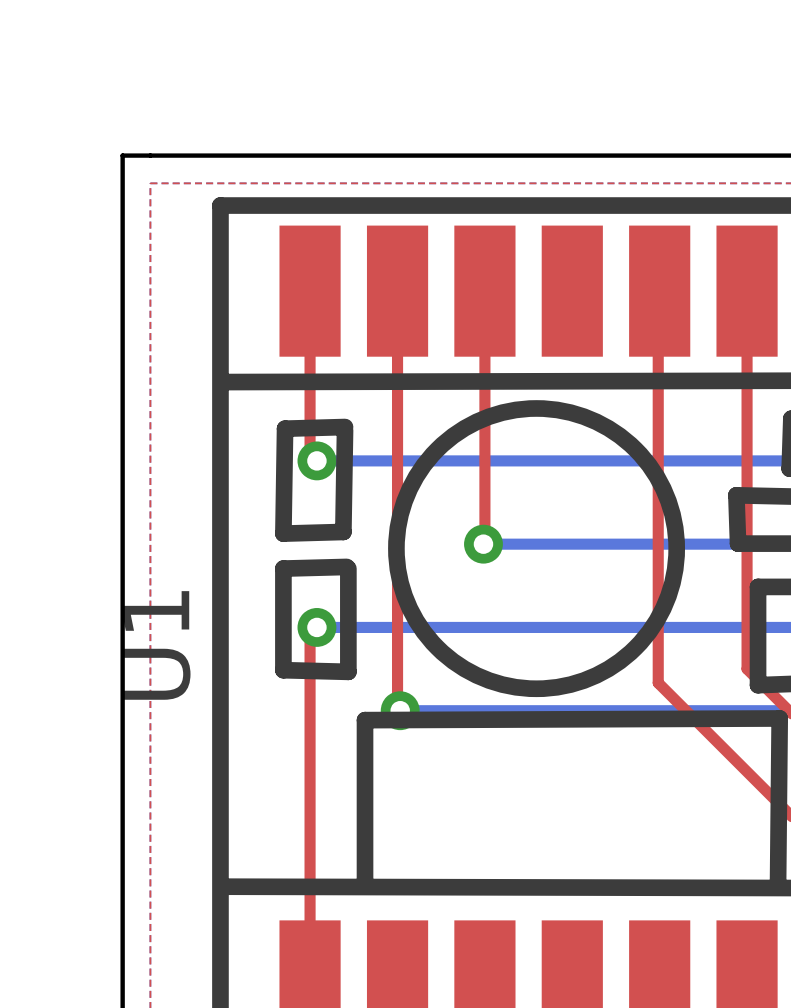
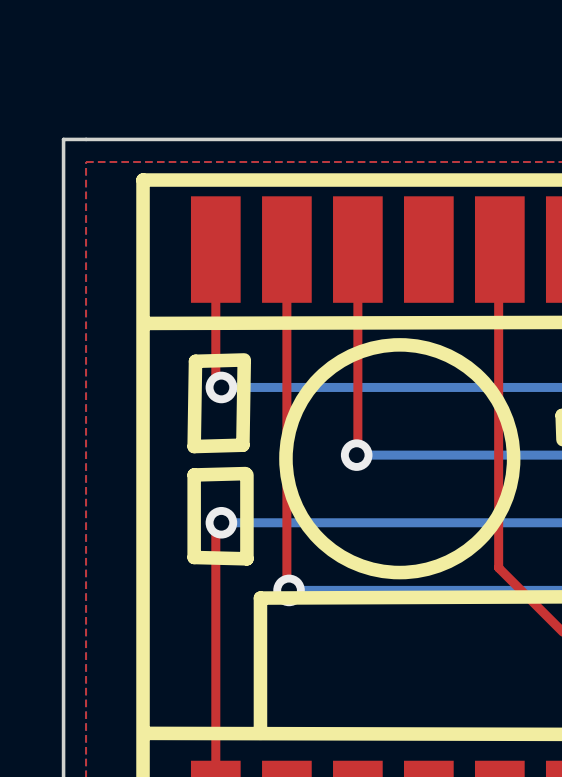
U1 name: U1 (156, 645) -> none

